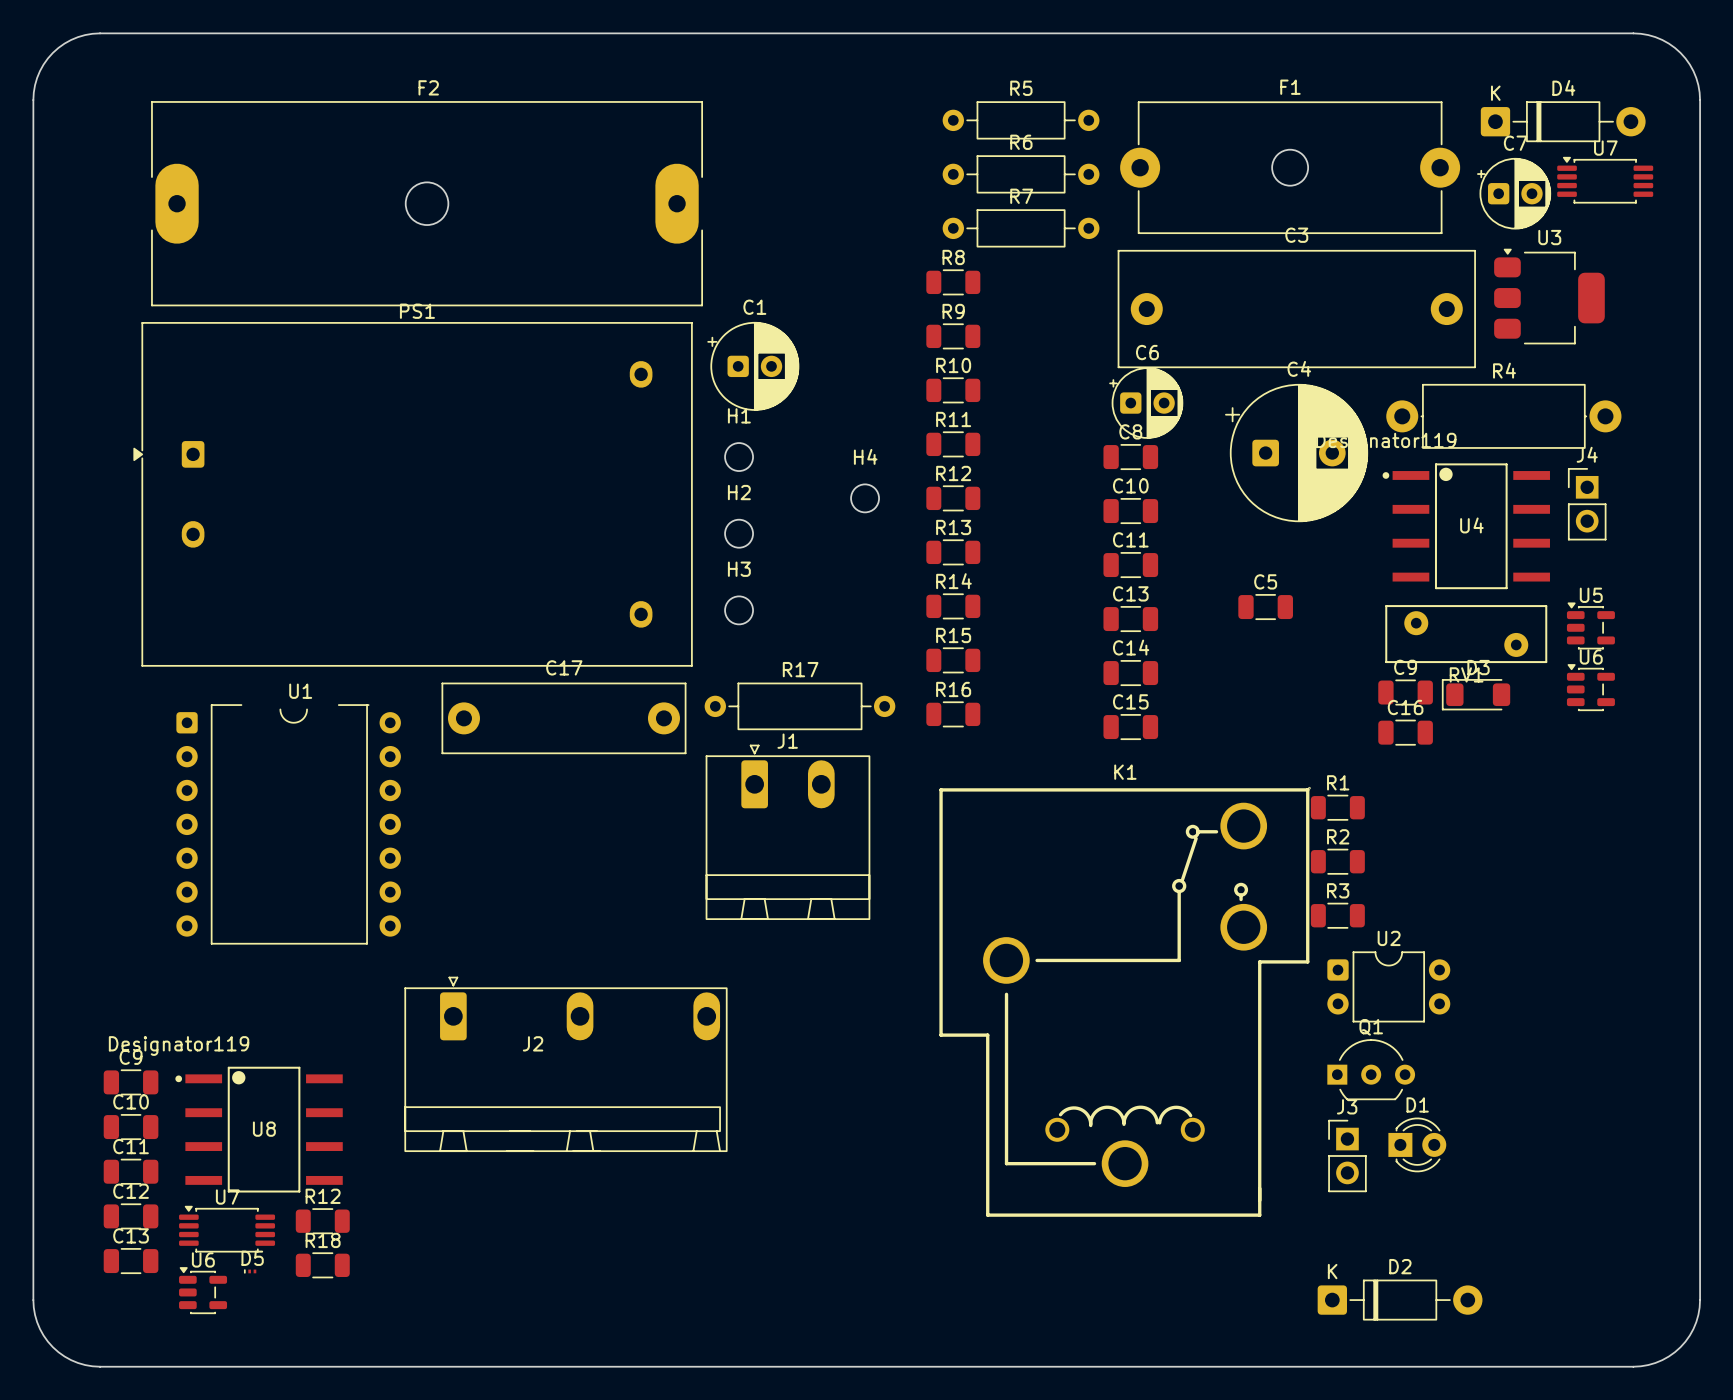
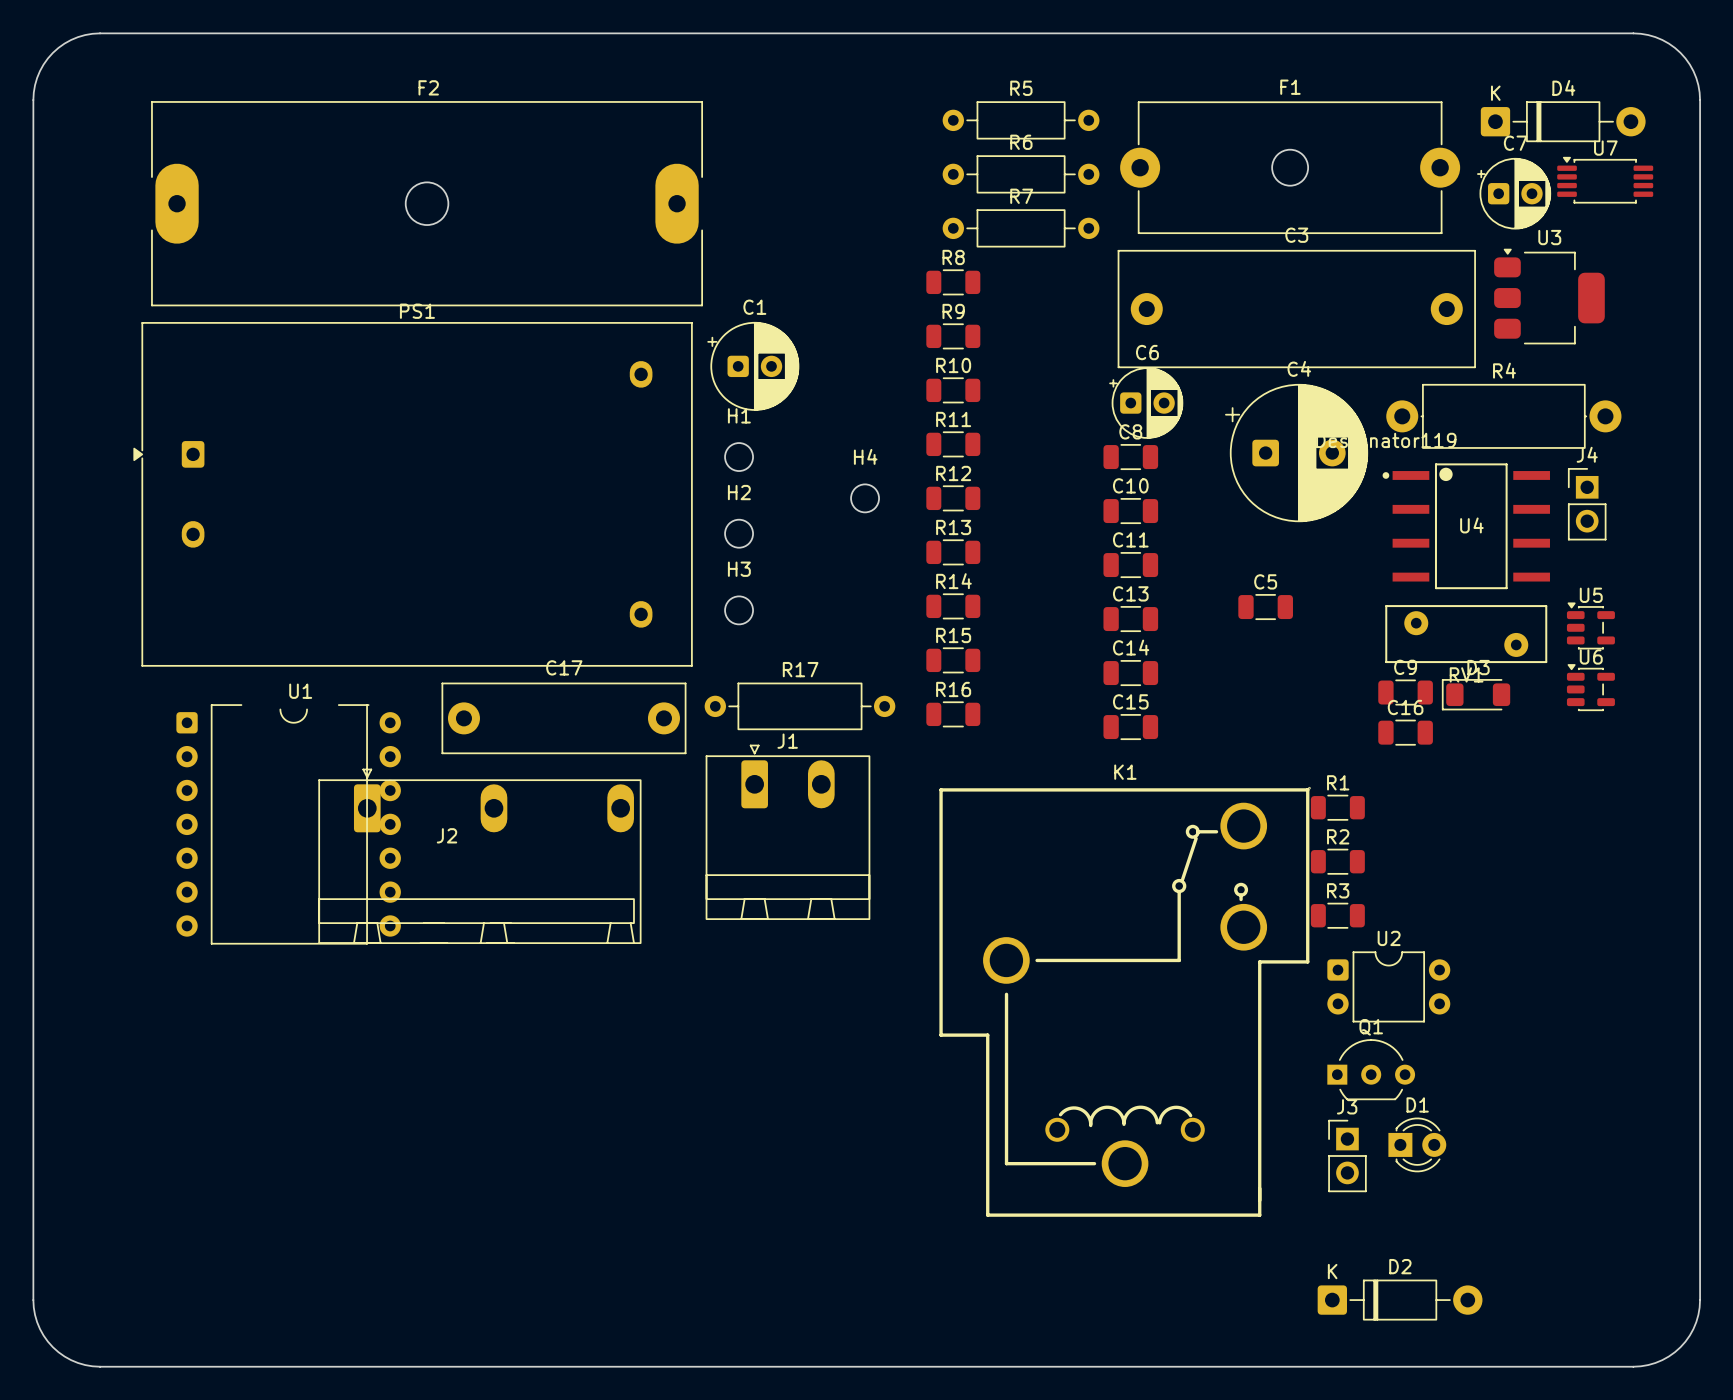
J2 position: (565, 1064) -> (479, 856)
C9: (131, 1082) -> none
C10: (131, 1127) -> none
U8: (259, 1129) -> none
C11: (131, 1171) -> none
C12: (131, 1216) -> none
R12: (322, 1221) -> none
U7: (227, 1229) -> none
C13: (131, 1261) -> none
R18: (322, 1265) -> none
D5: (250, 1271) -> none
U6: (203, 1290) -> none

